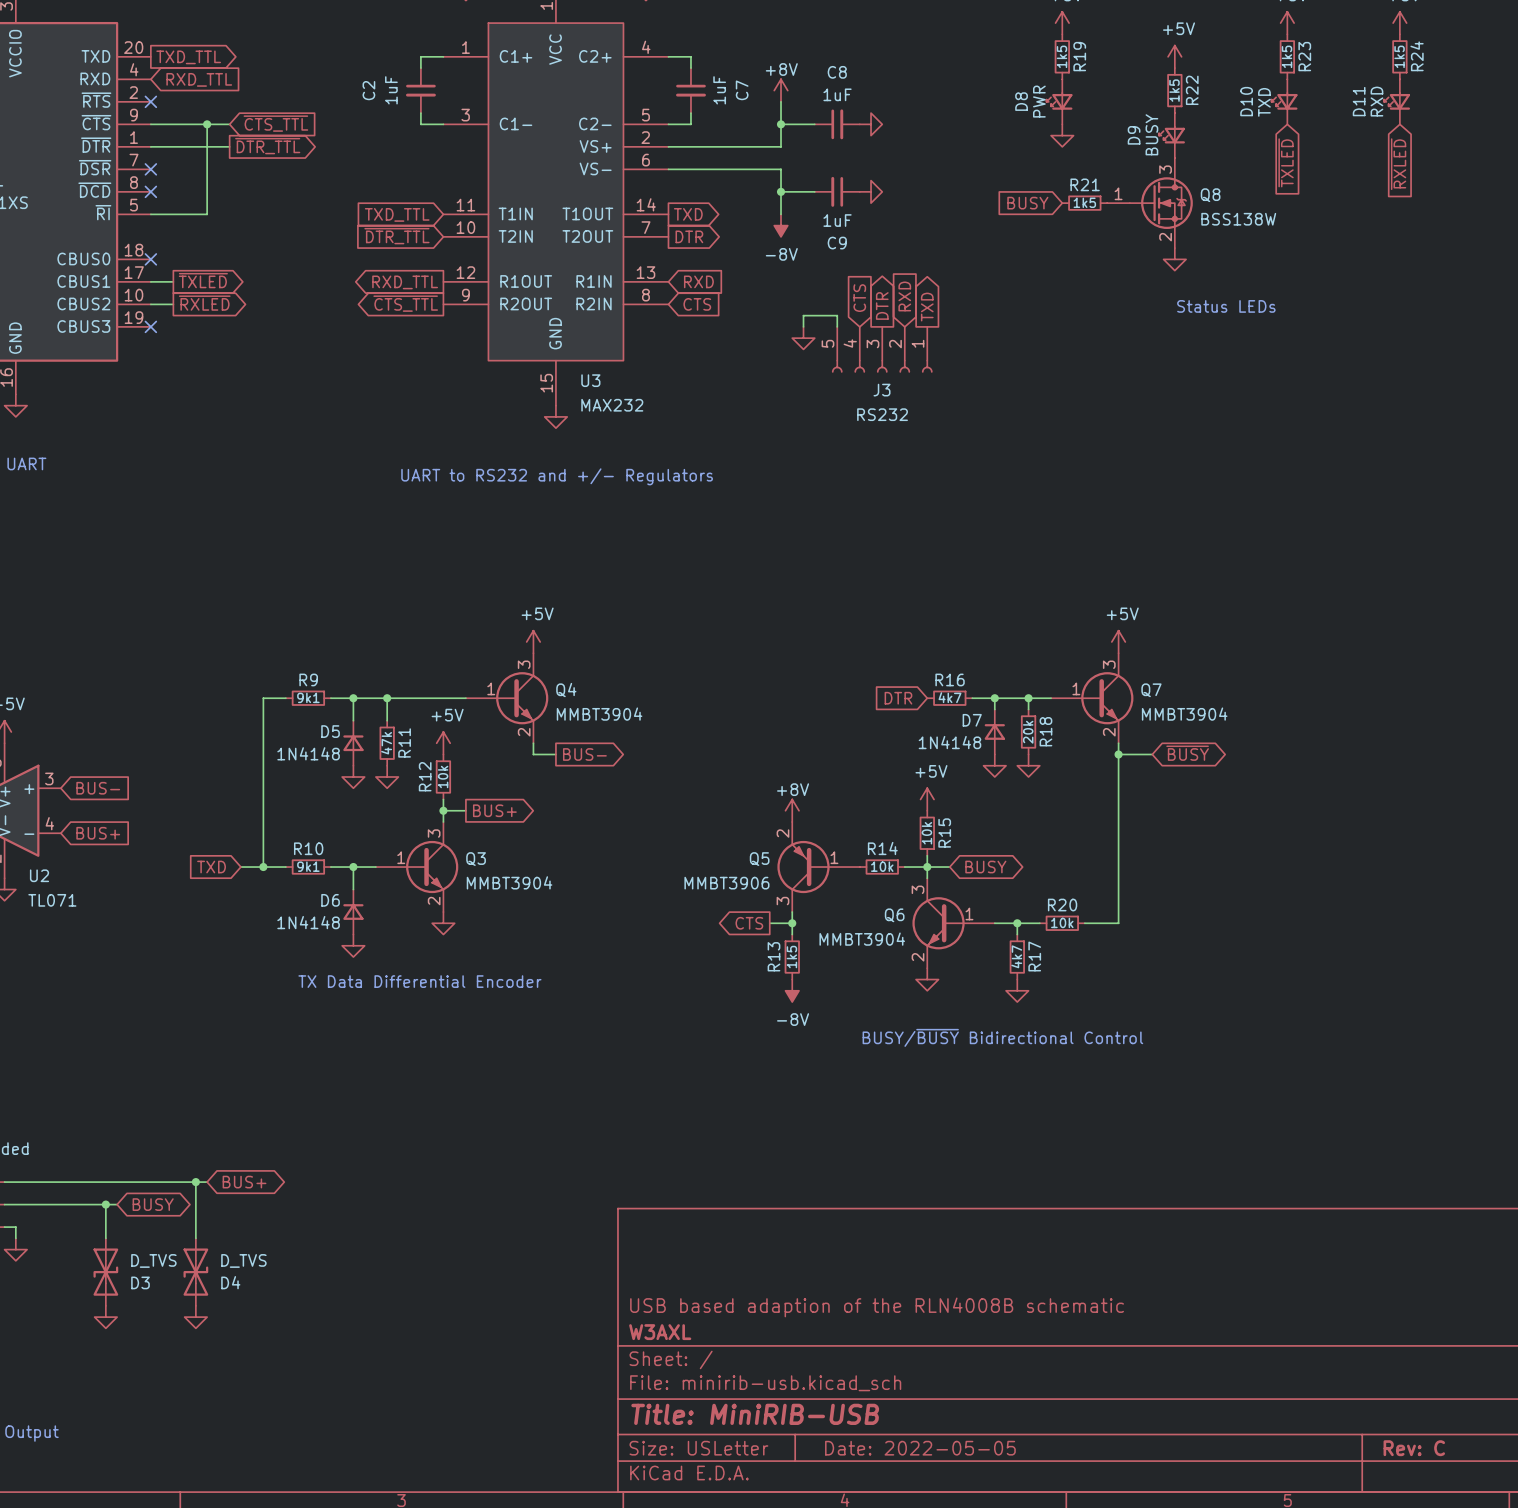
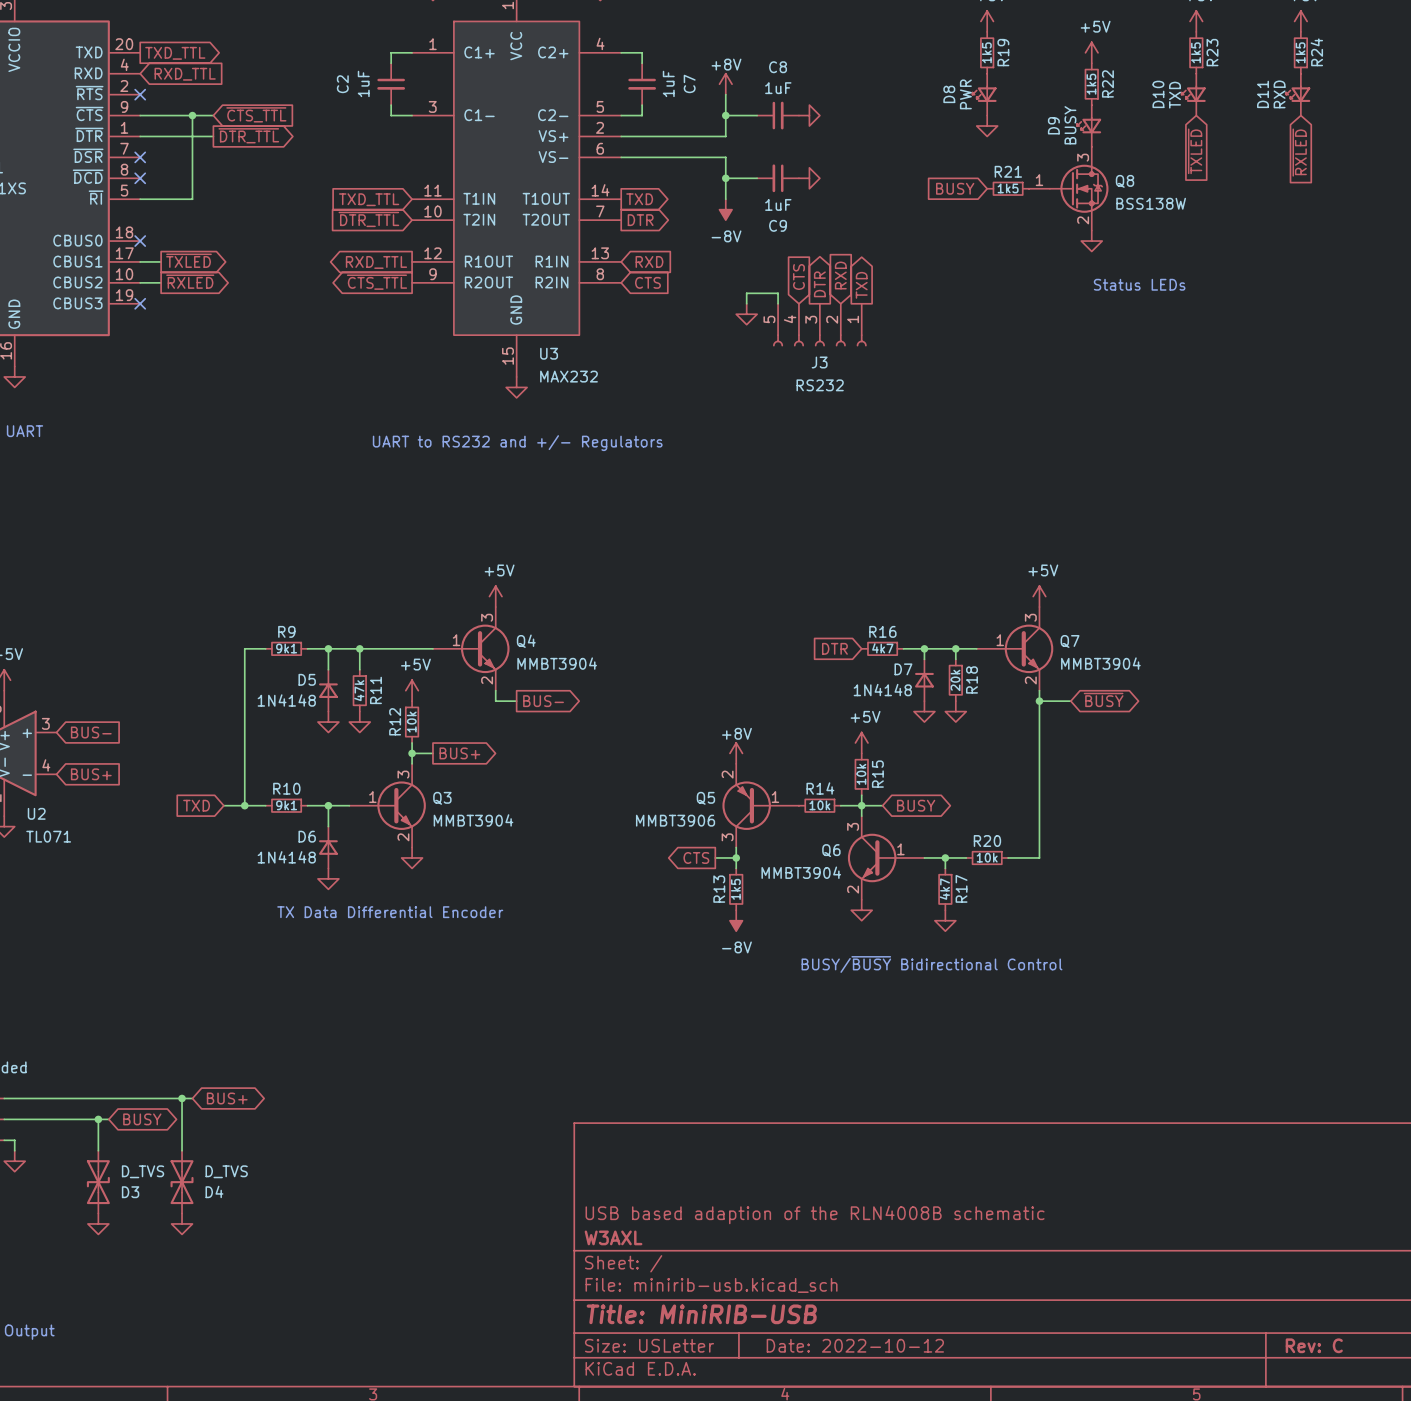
title block: Date: 2022-05-05 (920, 1448) -> Date: 2022-10-12 (855, 1345)

